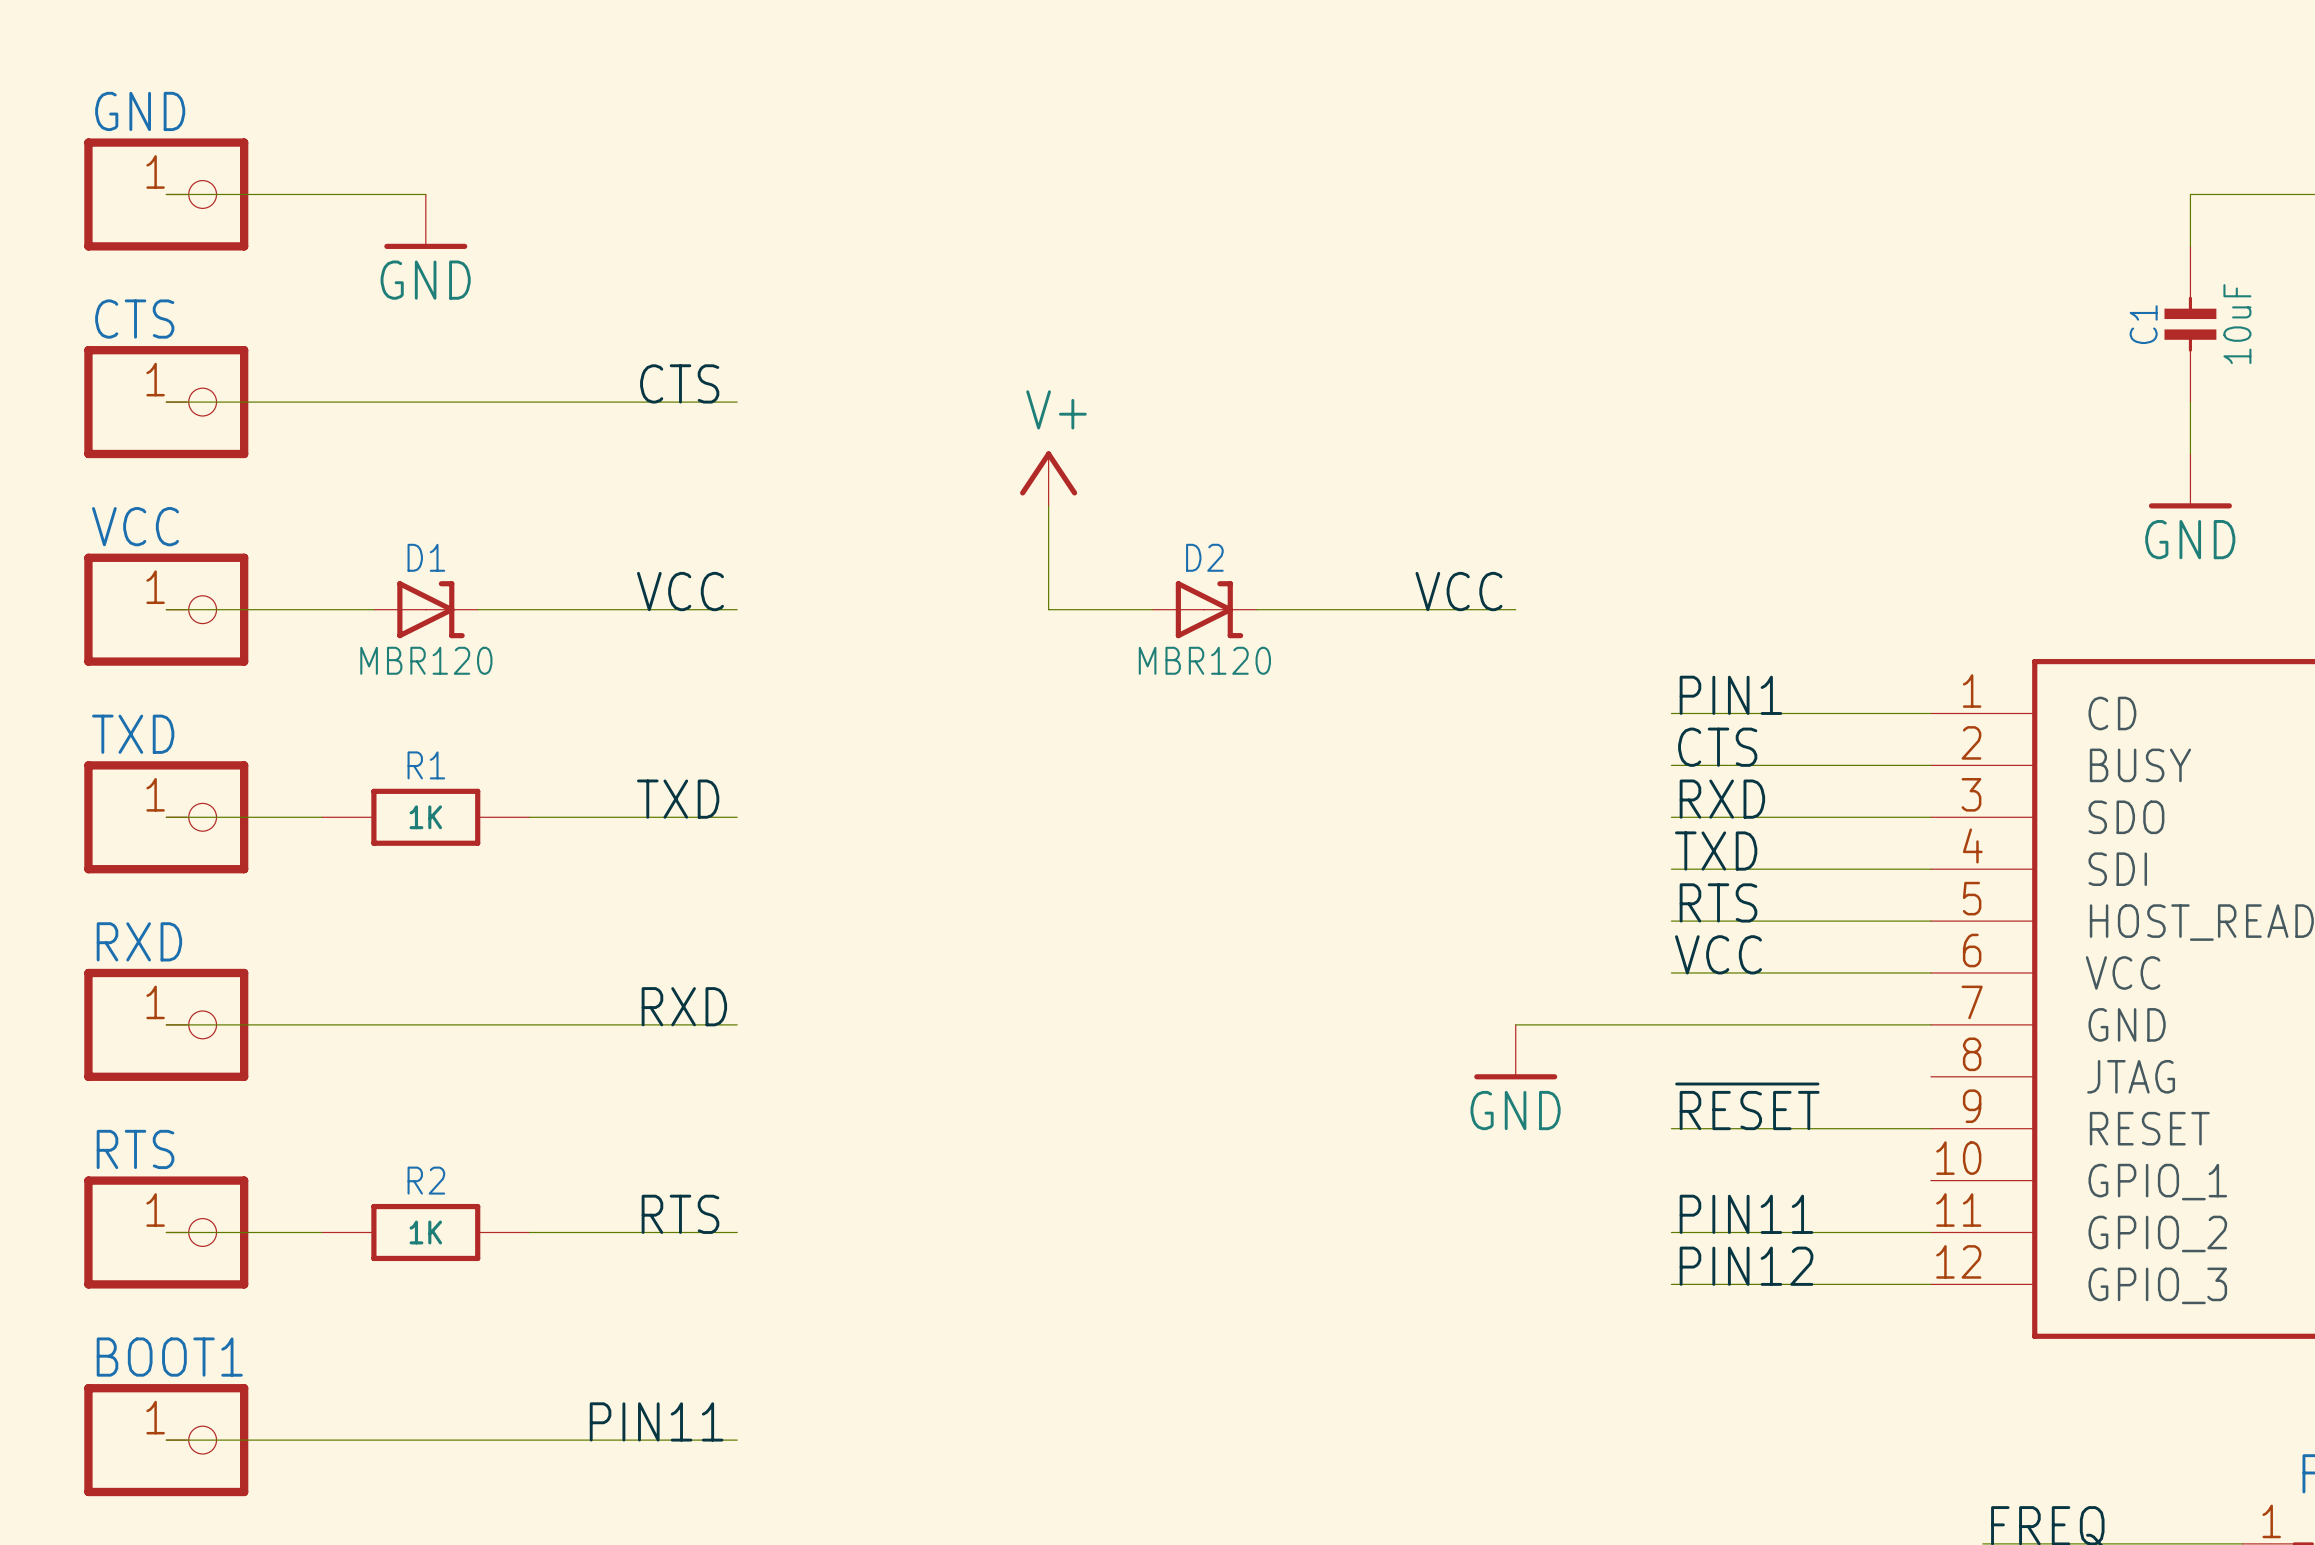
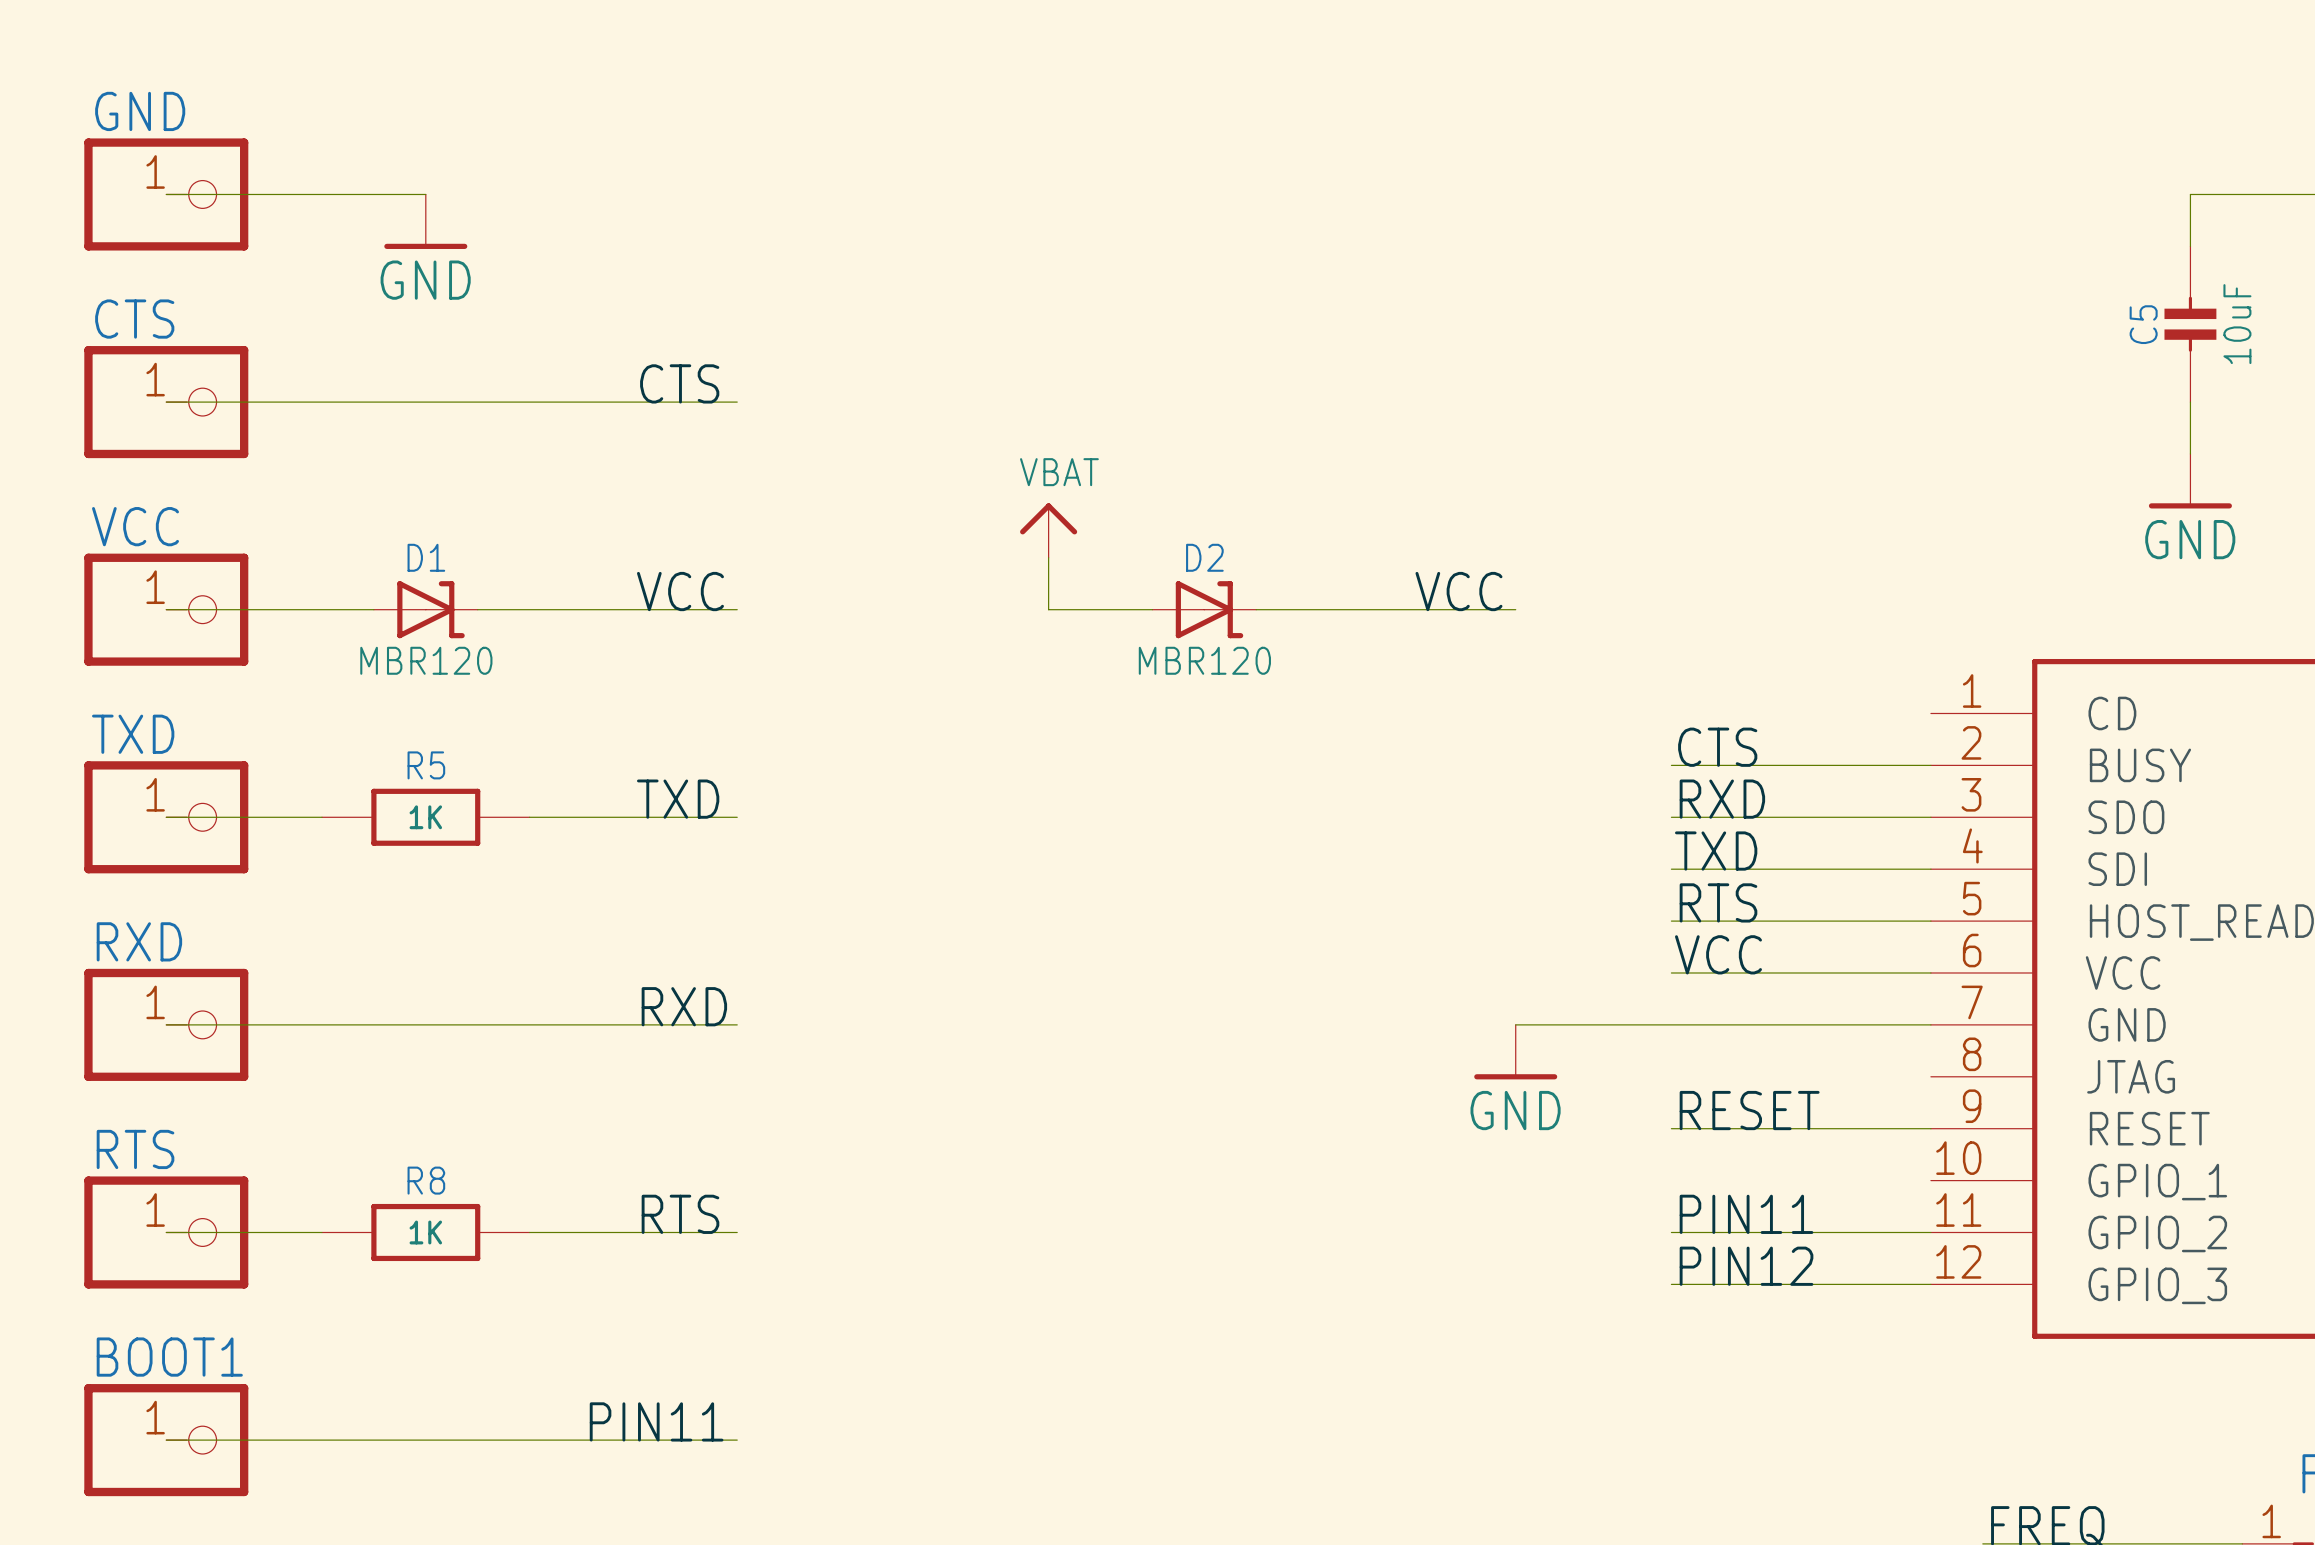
C1 name: C1 (2143, 324) -> C5 (2143, 324)
power symbol: V+ (1048, 478) -> none
power symbol: none -> VBAT (1048, 530)
label: PIN1 (1730, 695) -> none
wire: (1671, 713) (1930, 713) -> none
R1 name: R1 (426, 765) -> R5 (426, 765)
label: ~{RESET} (1747, 1106) -> RESET (1749, 1110)
R2 name: R2 (426, 1180) -> R8 (426, 1180)

